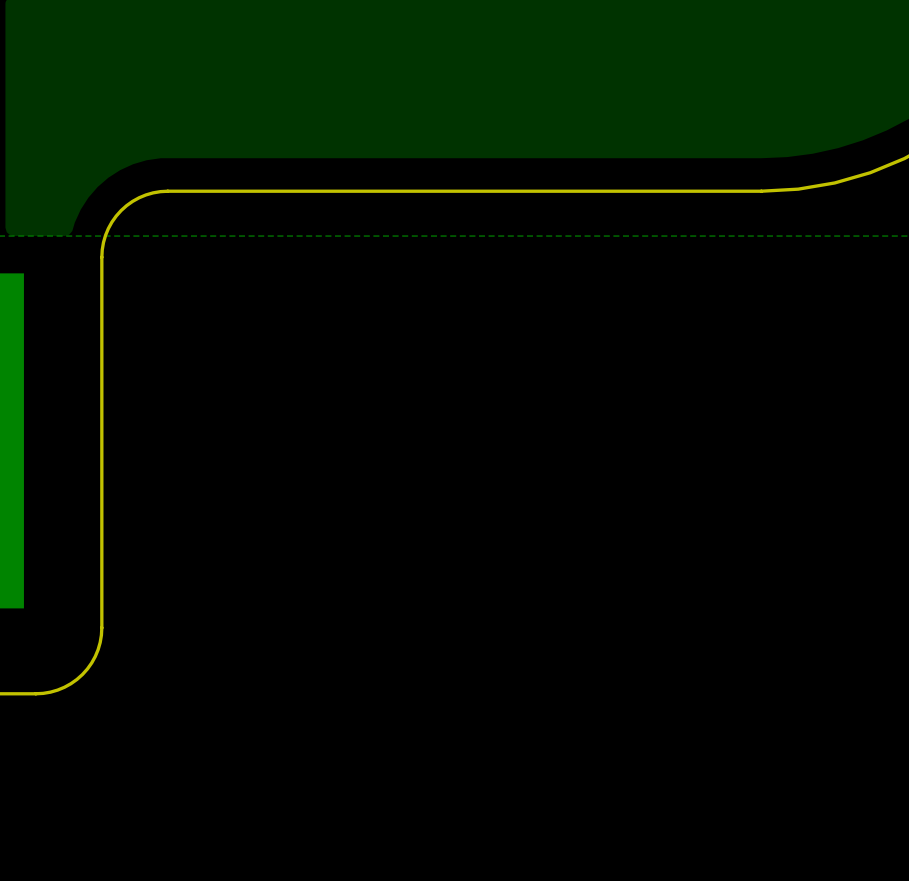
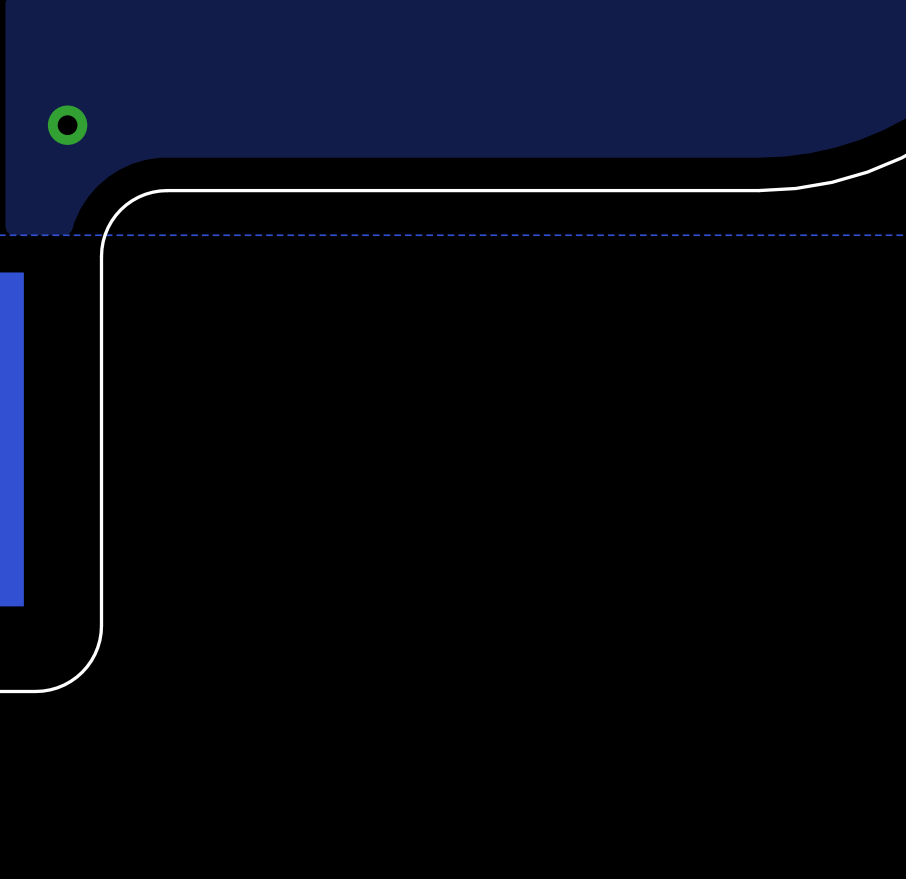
via: none -> (67, 125)

